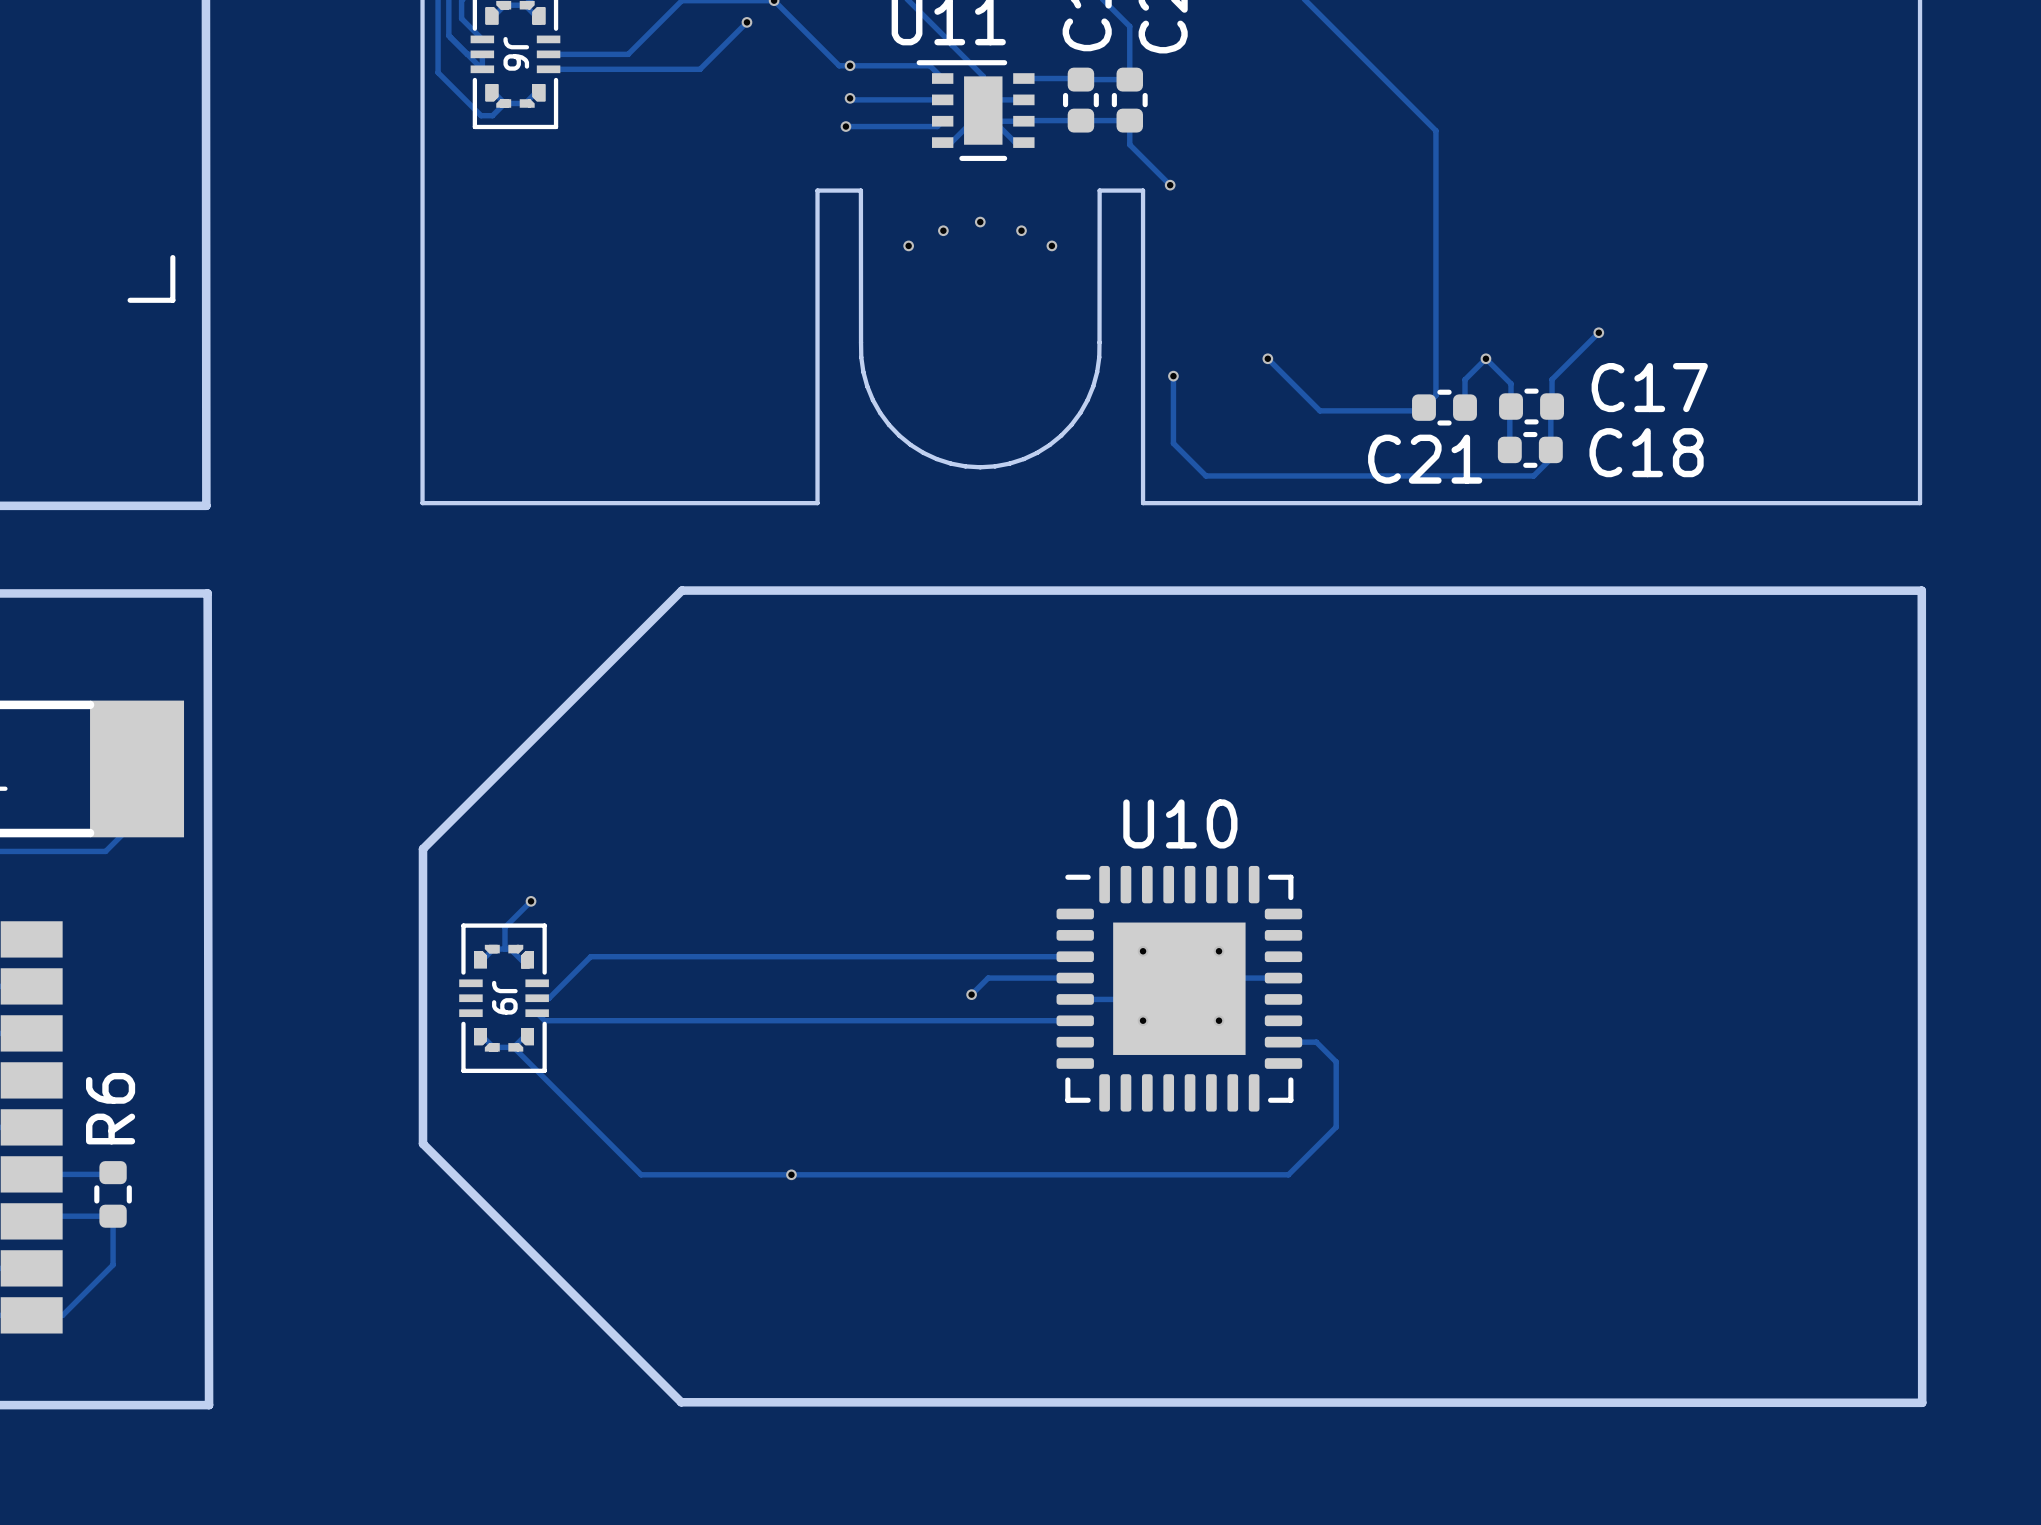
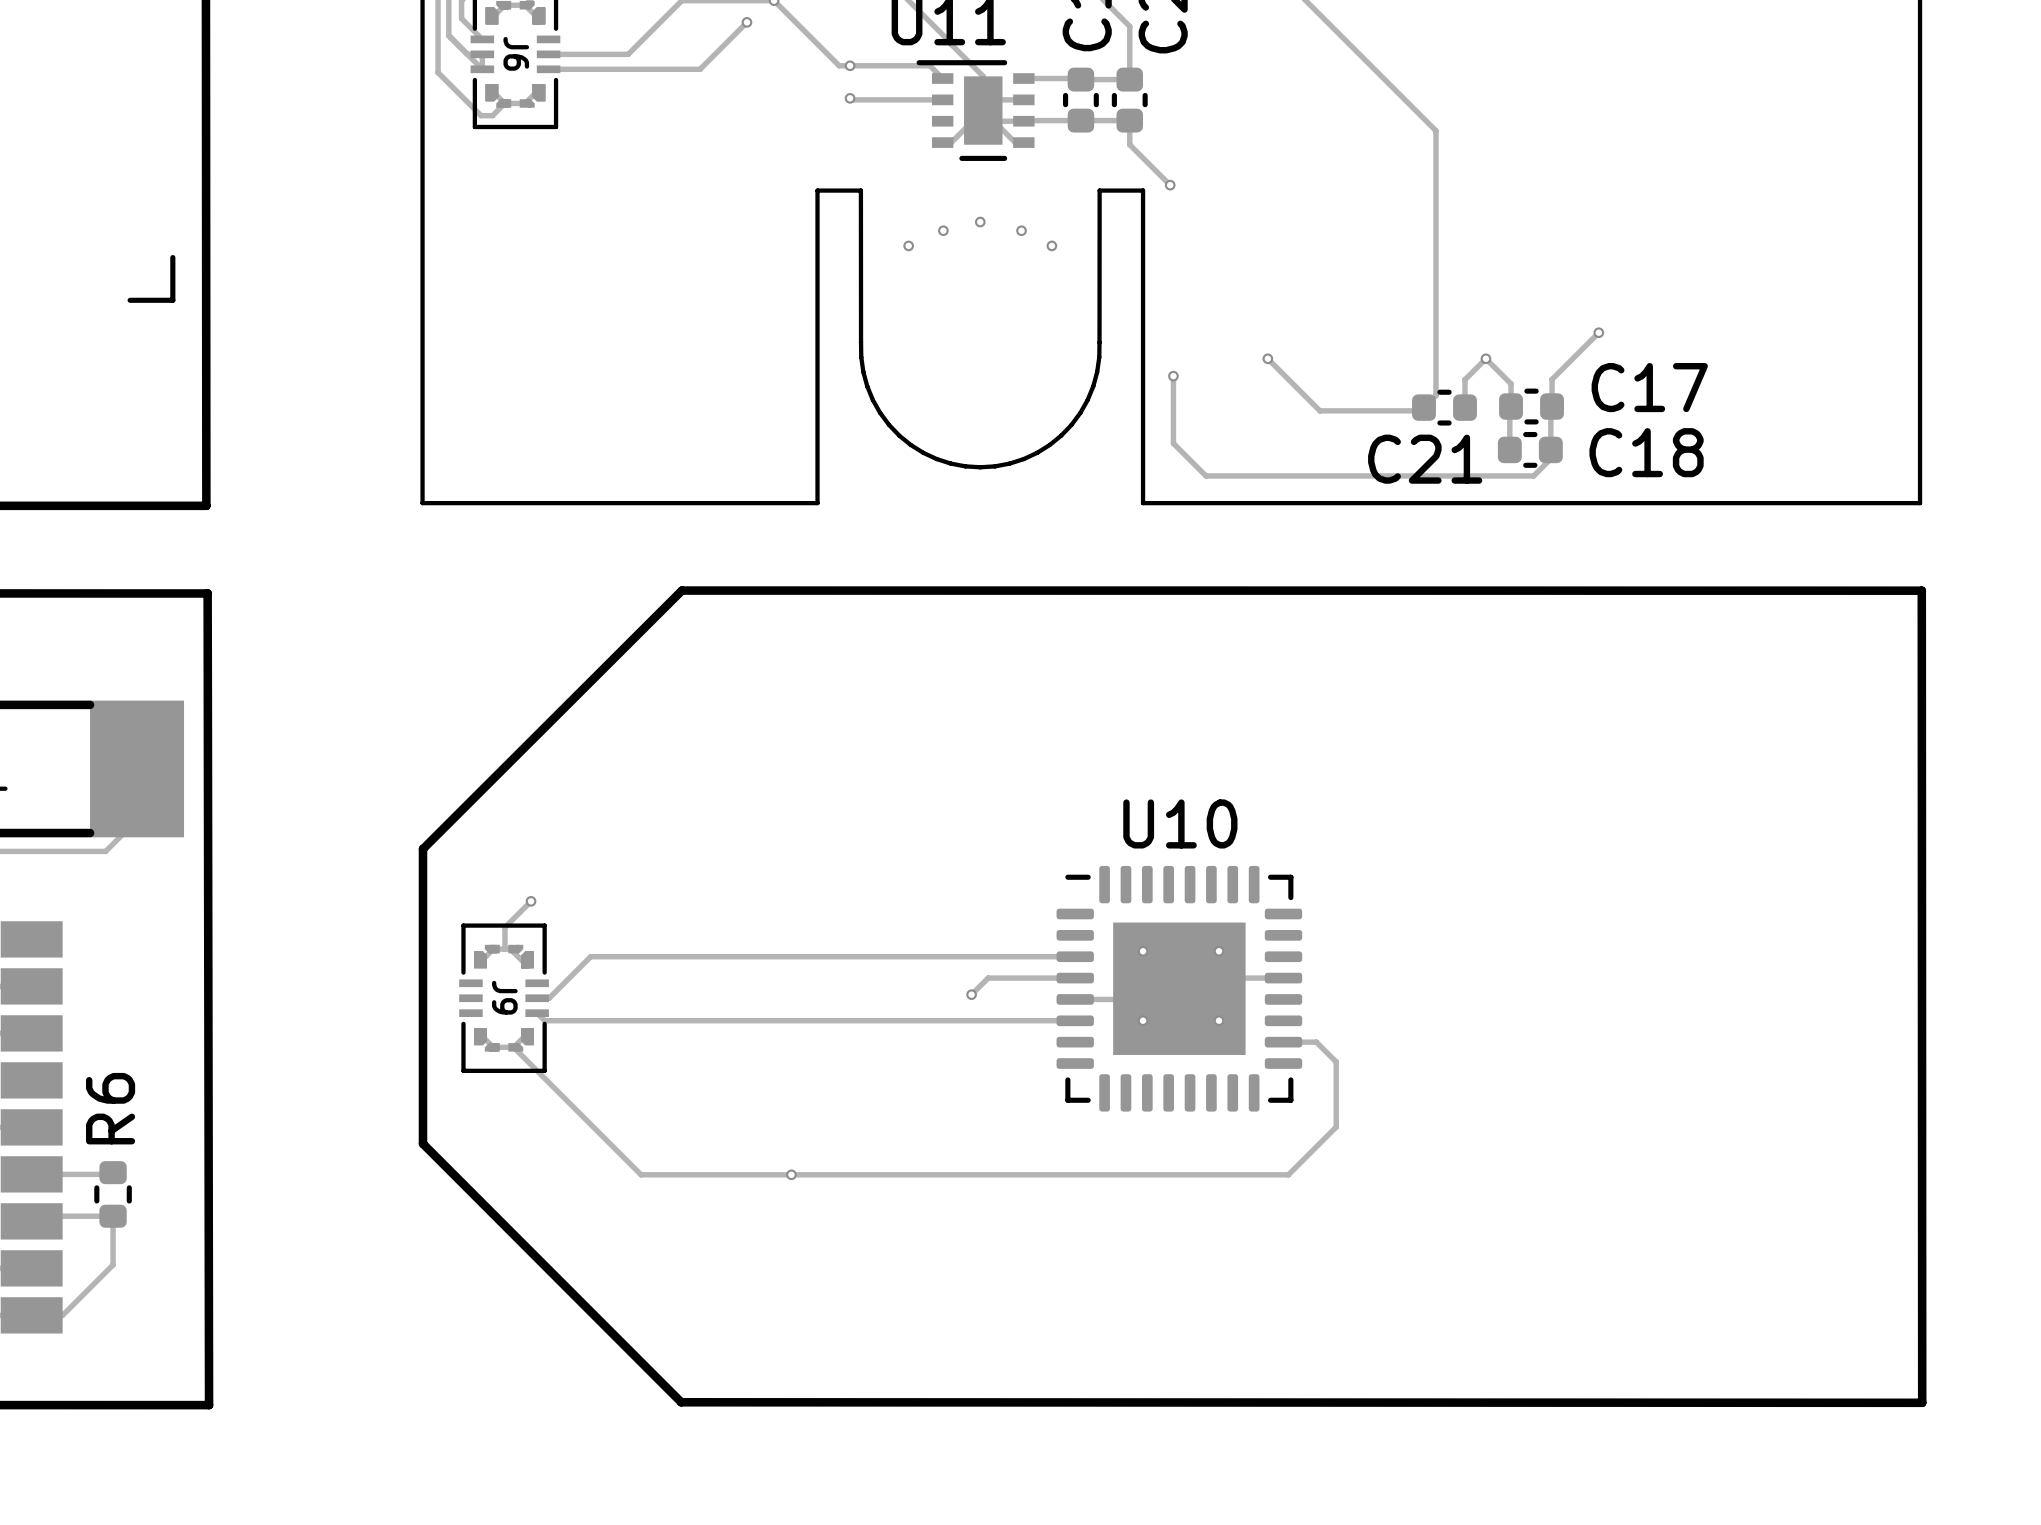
track: (942, 121) (937, 126) (845, 126) -> none
via: (845, 126) -> none

